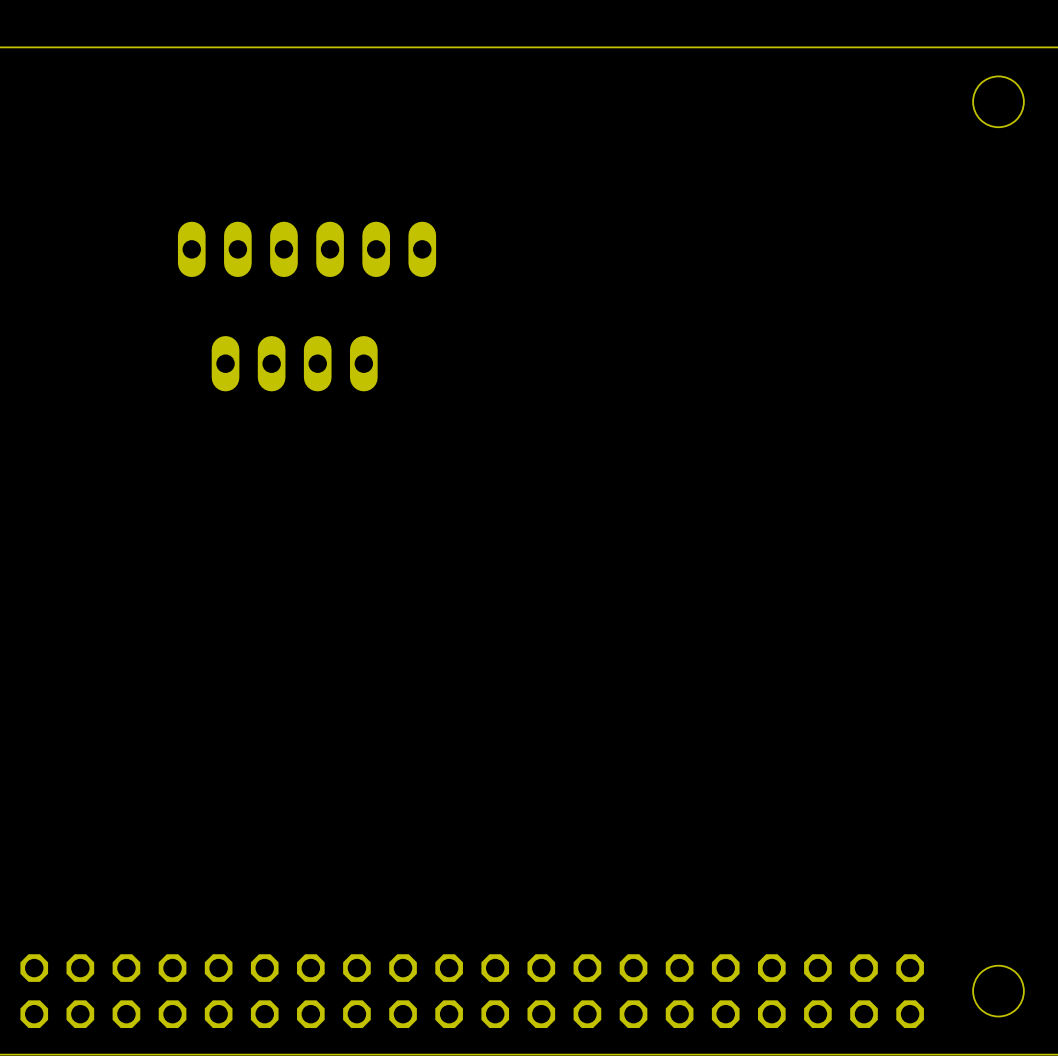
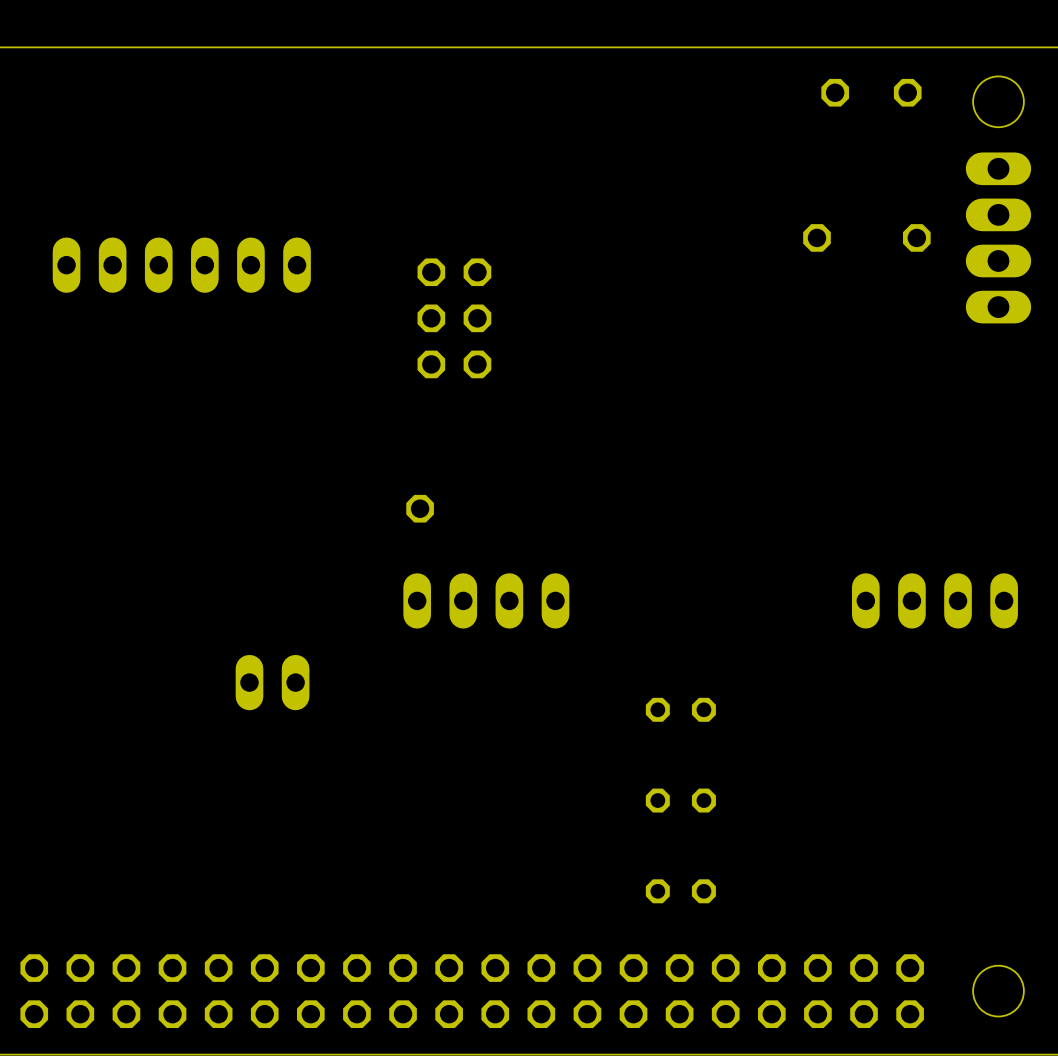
part: none -> (835, 92)
part: none -> (907, 92)
part: none -> (817, 237)
part: none -> (916, 237)
part: none -> (998, 237)
part position: (307, 249) -> (181, 265)
part: none -> (454, 318)
part position: (294, 363) -> (486, 600)
part: none -> (420, 508)
part: none -> (934, 600)
part: none -> (272, 682)
part: none -> (680, 709)
part: none -> (680, 800)
part: none -> (680, 891)

